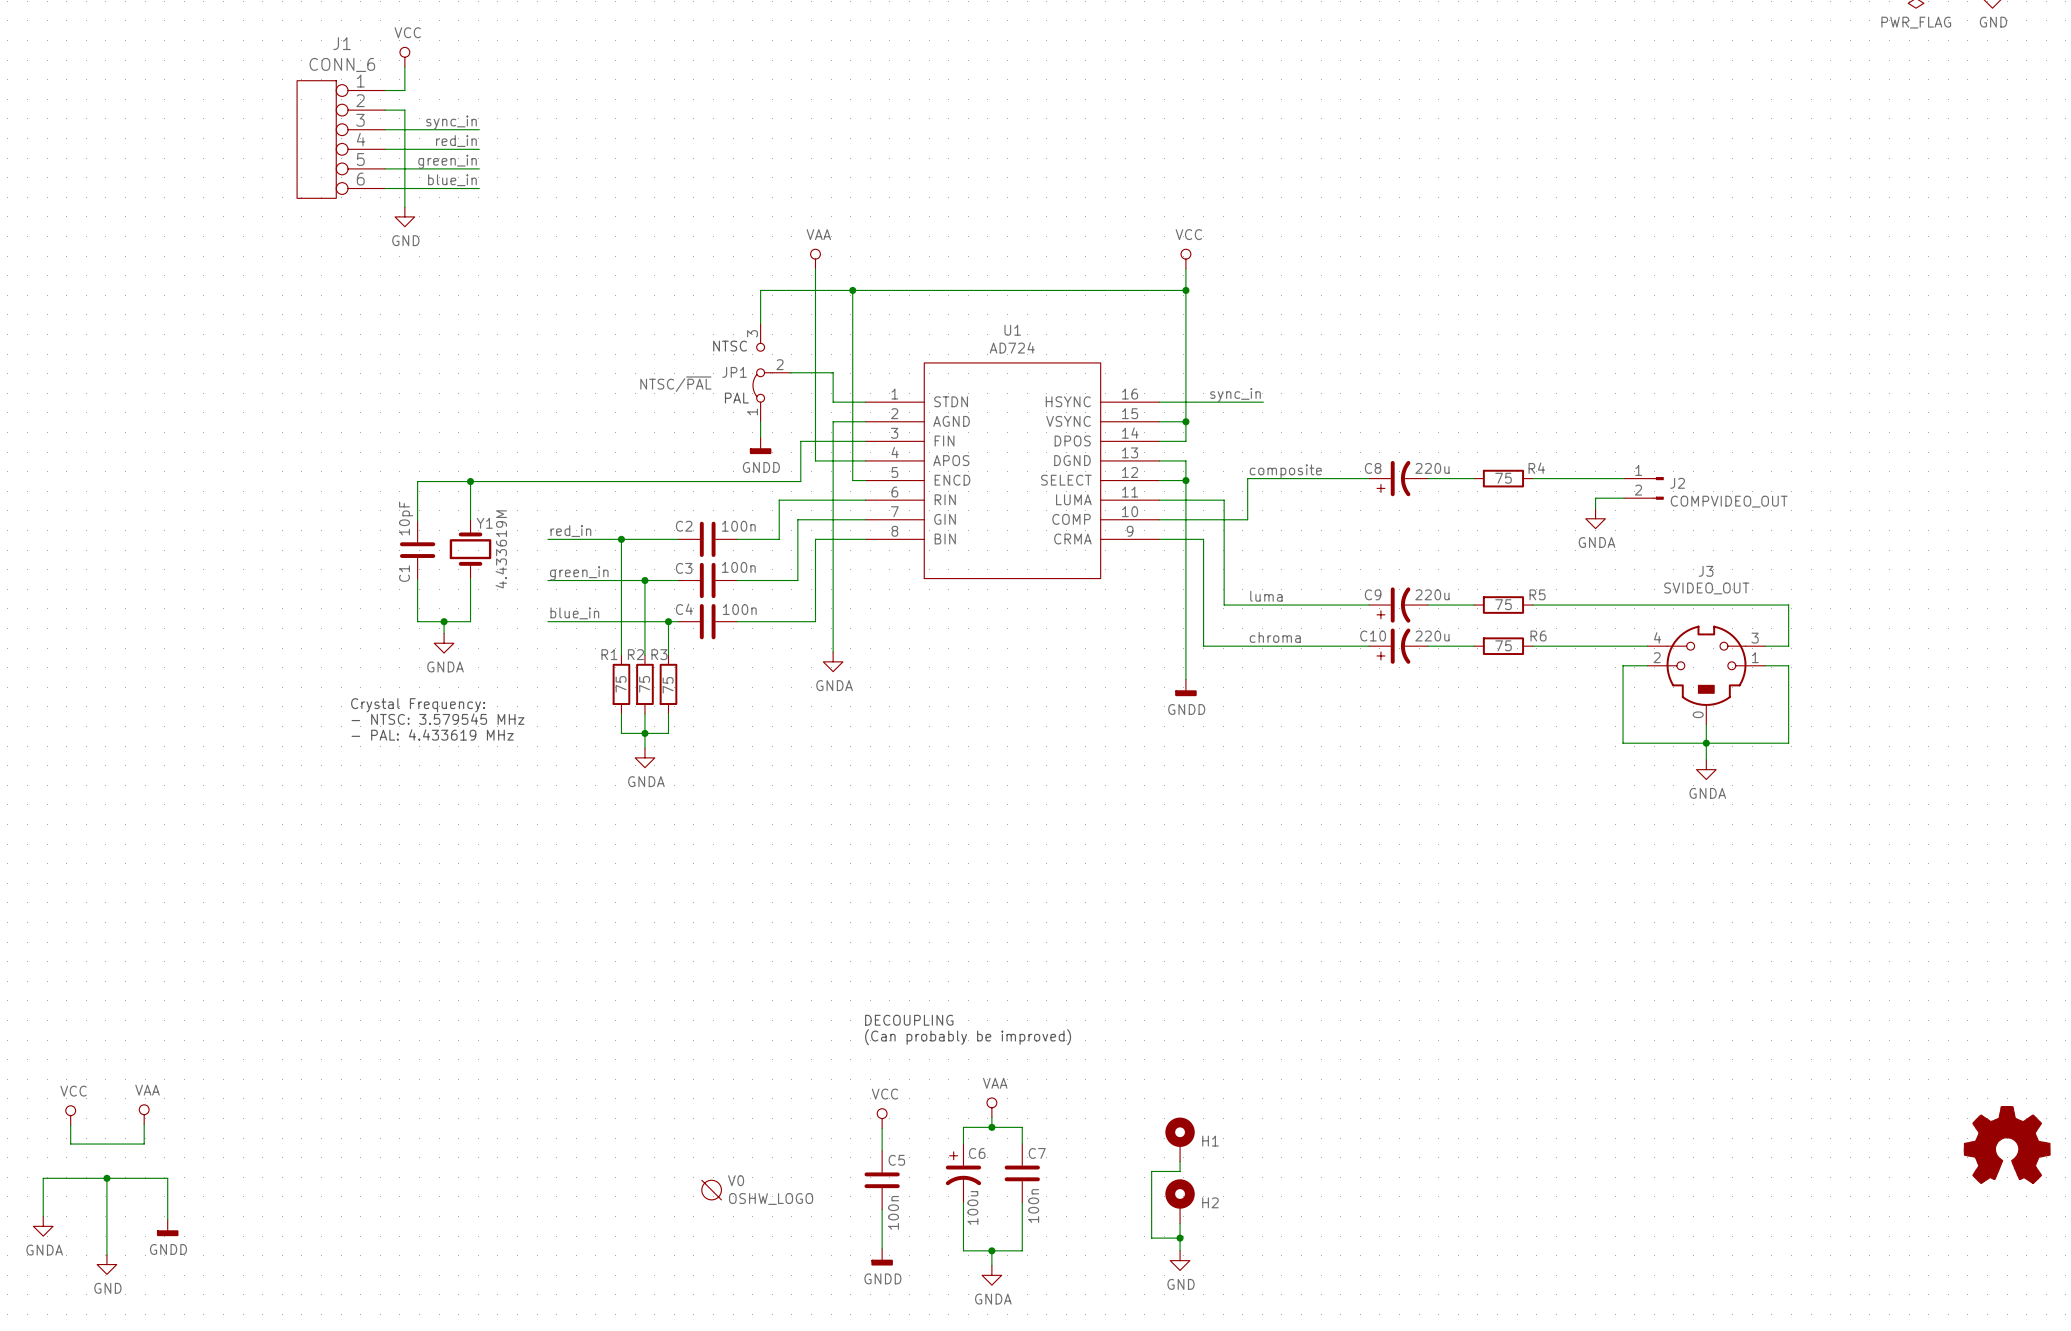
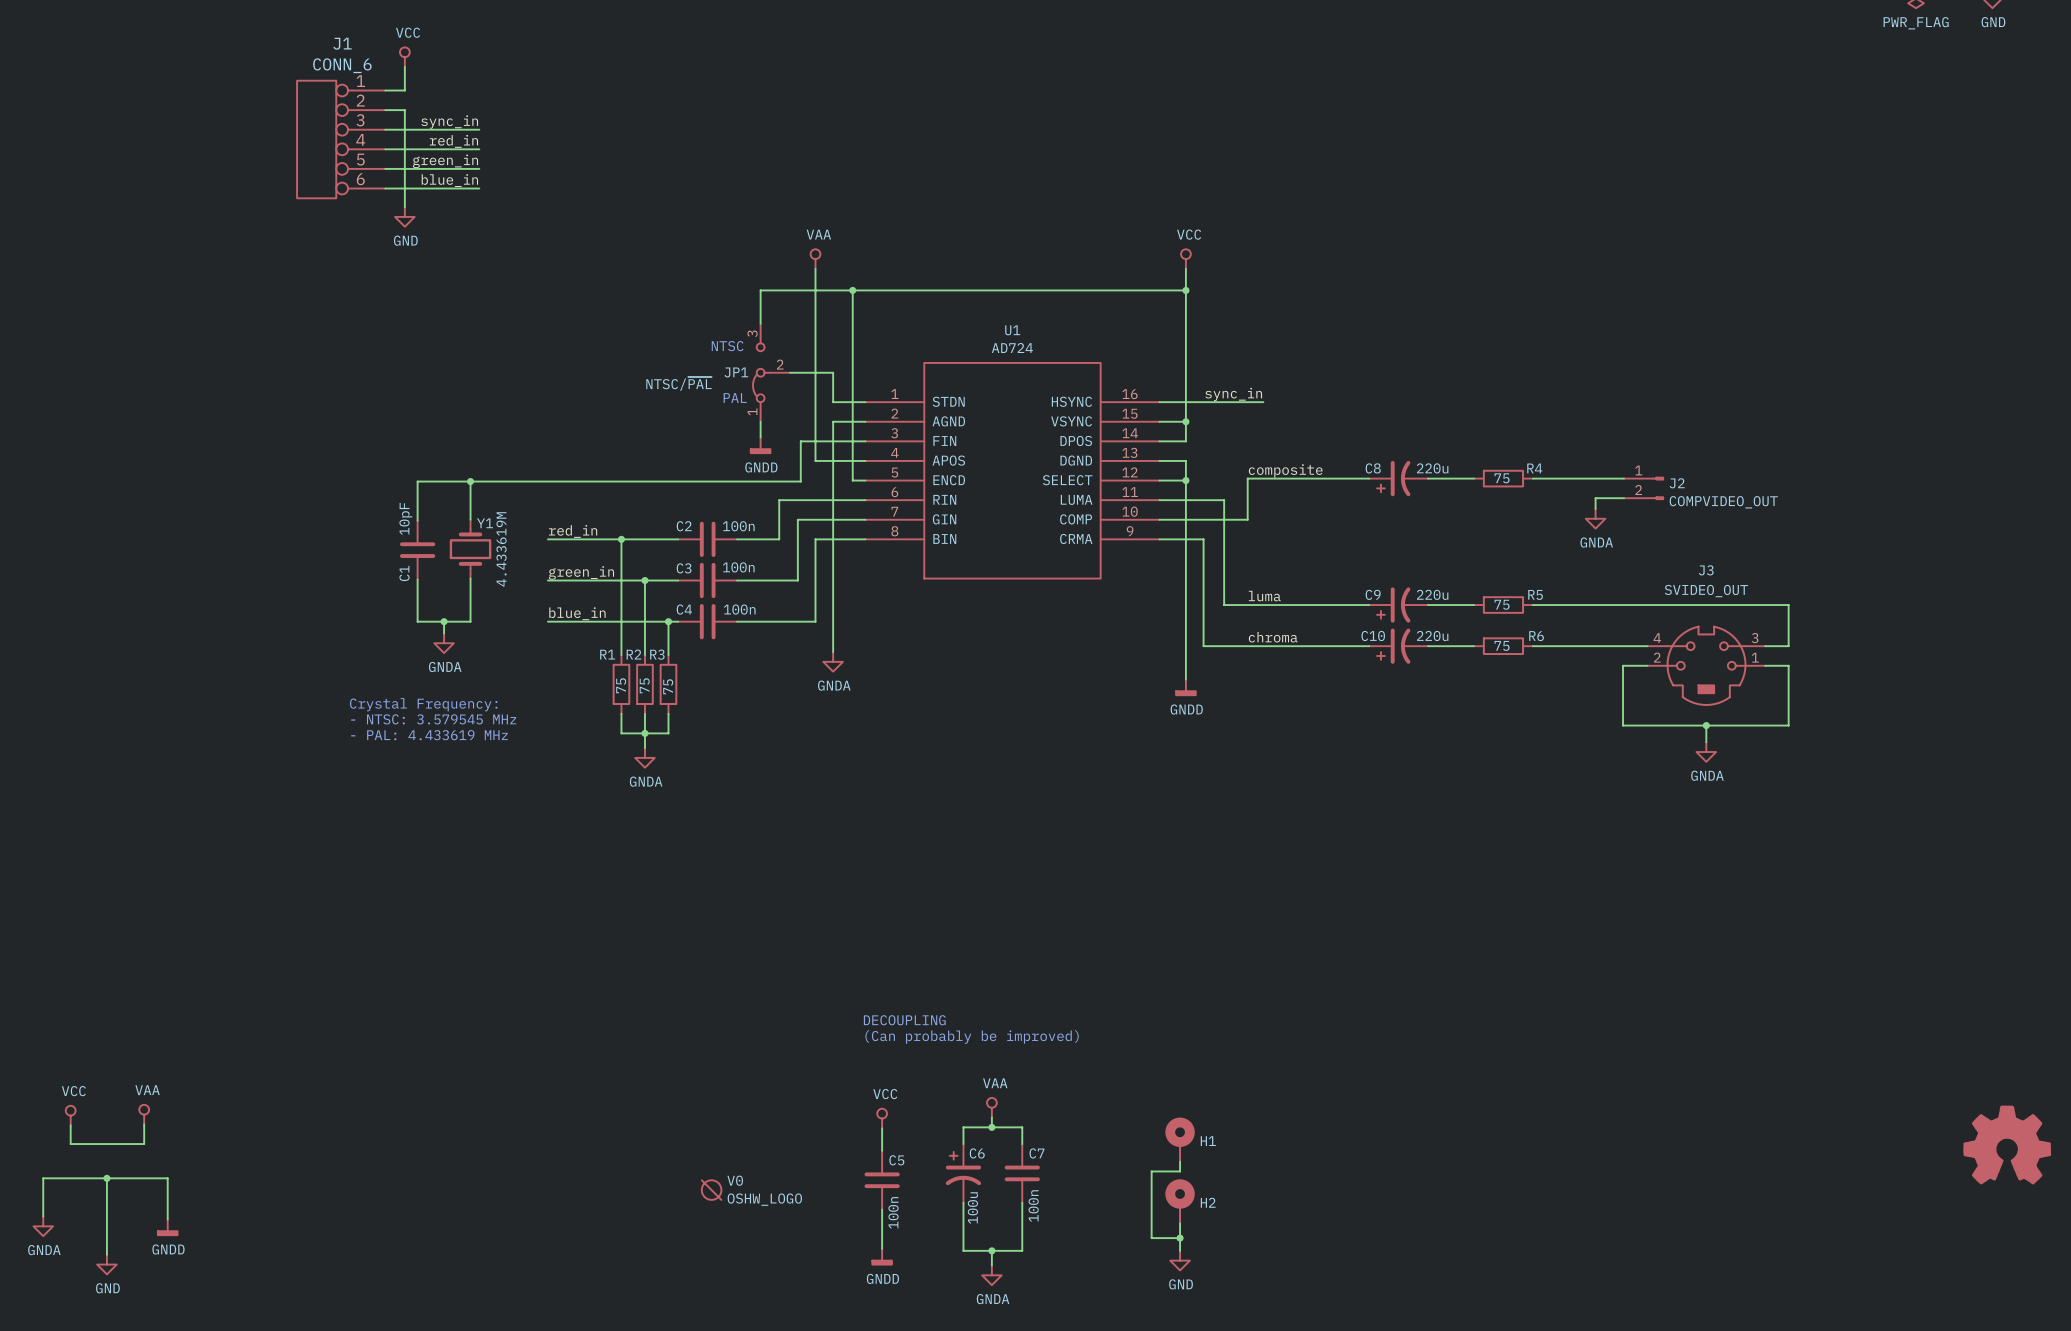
J3 symbol: [1647, 625, 1766, 725] -> [1647, 625, 1766, 706]
wire: (1623, 725) (1623, 743) (1788, 743) (1788, 725) -> (1623, 725) (1788, 725)
junction position: (1706, 743) -> (1706, 725)
power symbol position: GNDA (1706, 769) -> GNDA (1706, 752)

